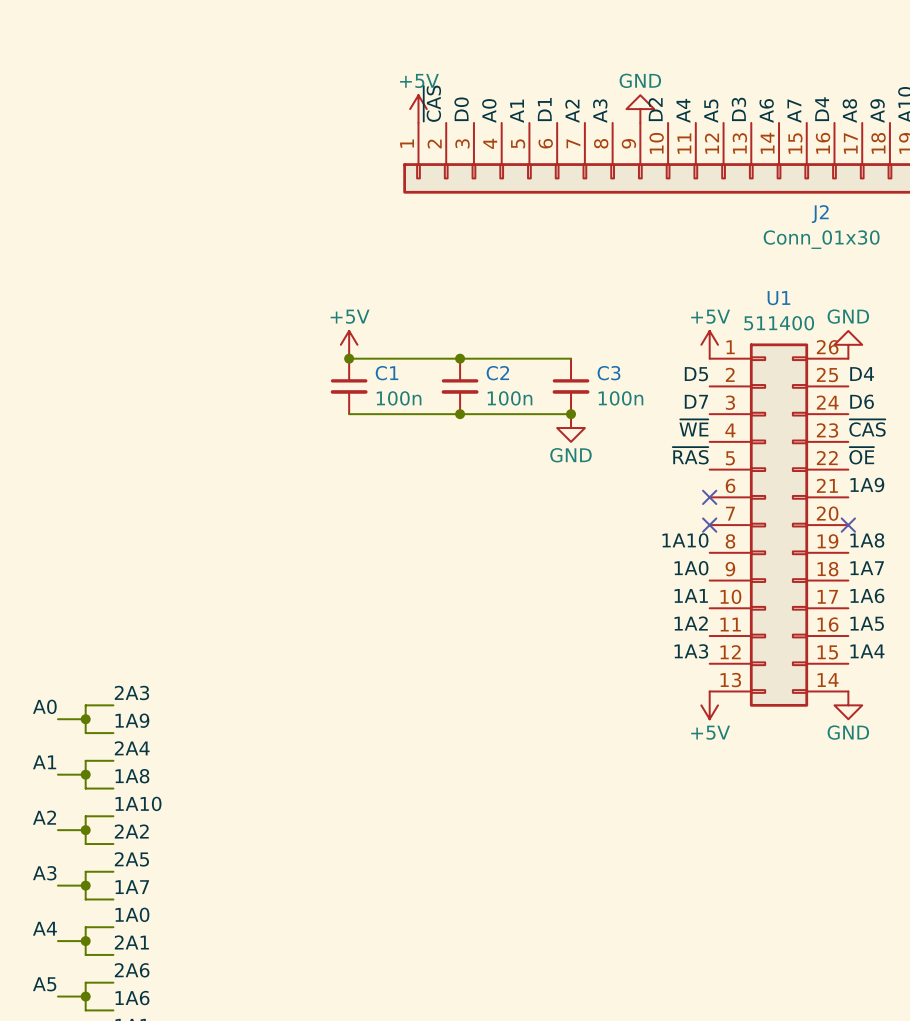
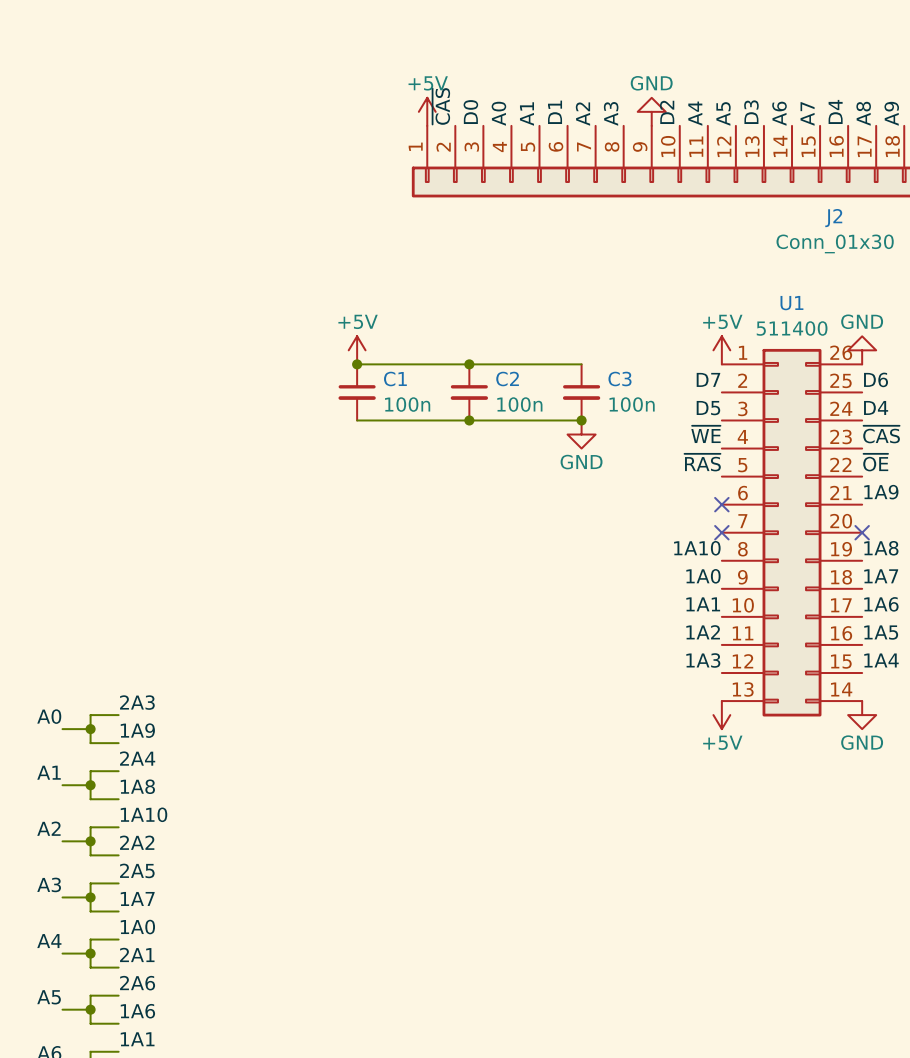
label: D5 (696, 374) -> D7 (708, 379)
label: D4 (862, 374) -> D6 (876, 379)
label: D7 (696, 401) -> D5 (708, 408)
label: D6 (862, 401) -> D4 (876, 407)

